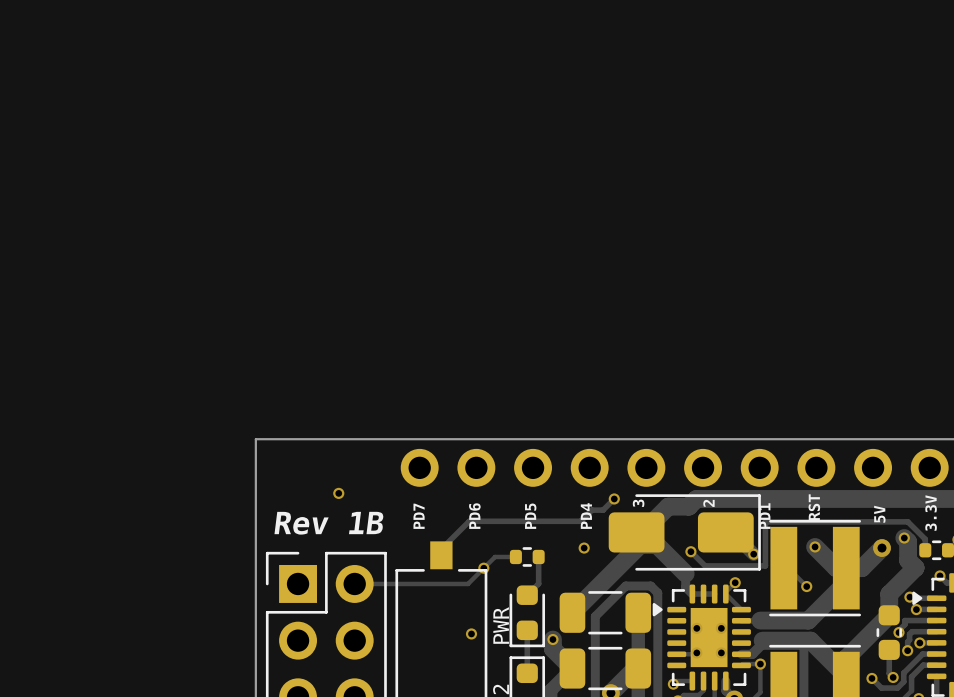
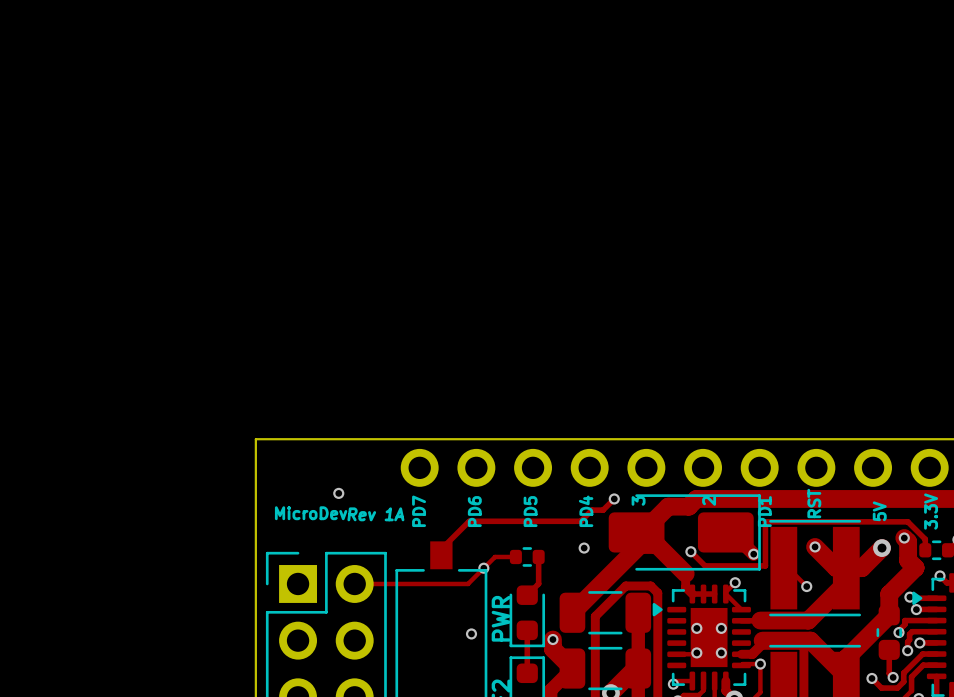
text: none -> Rev 1A (375, 514)
text: Rev 1B (329, 523) -> MicroDev (311, 513)

